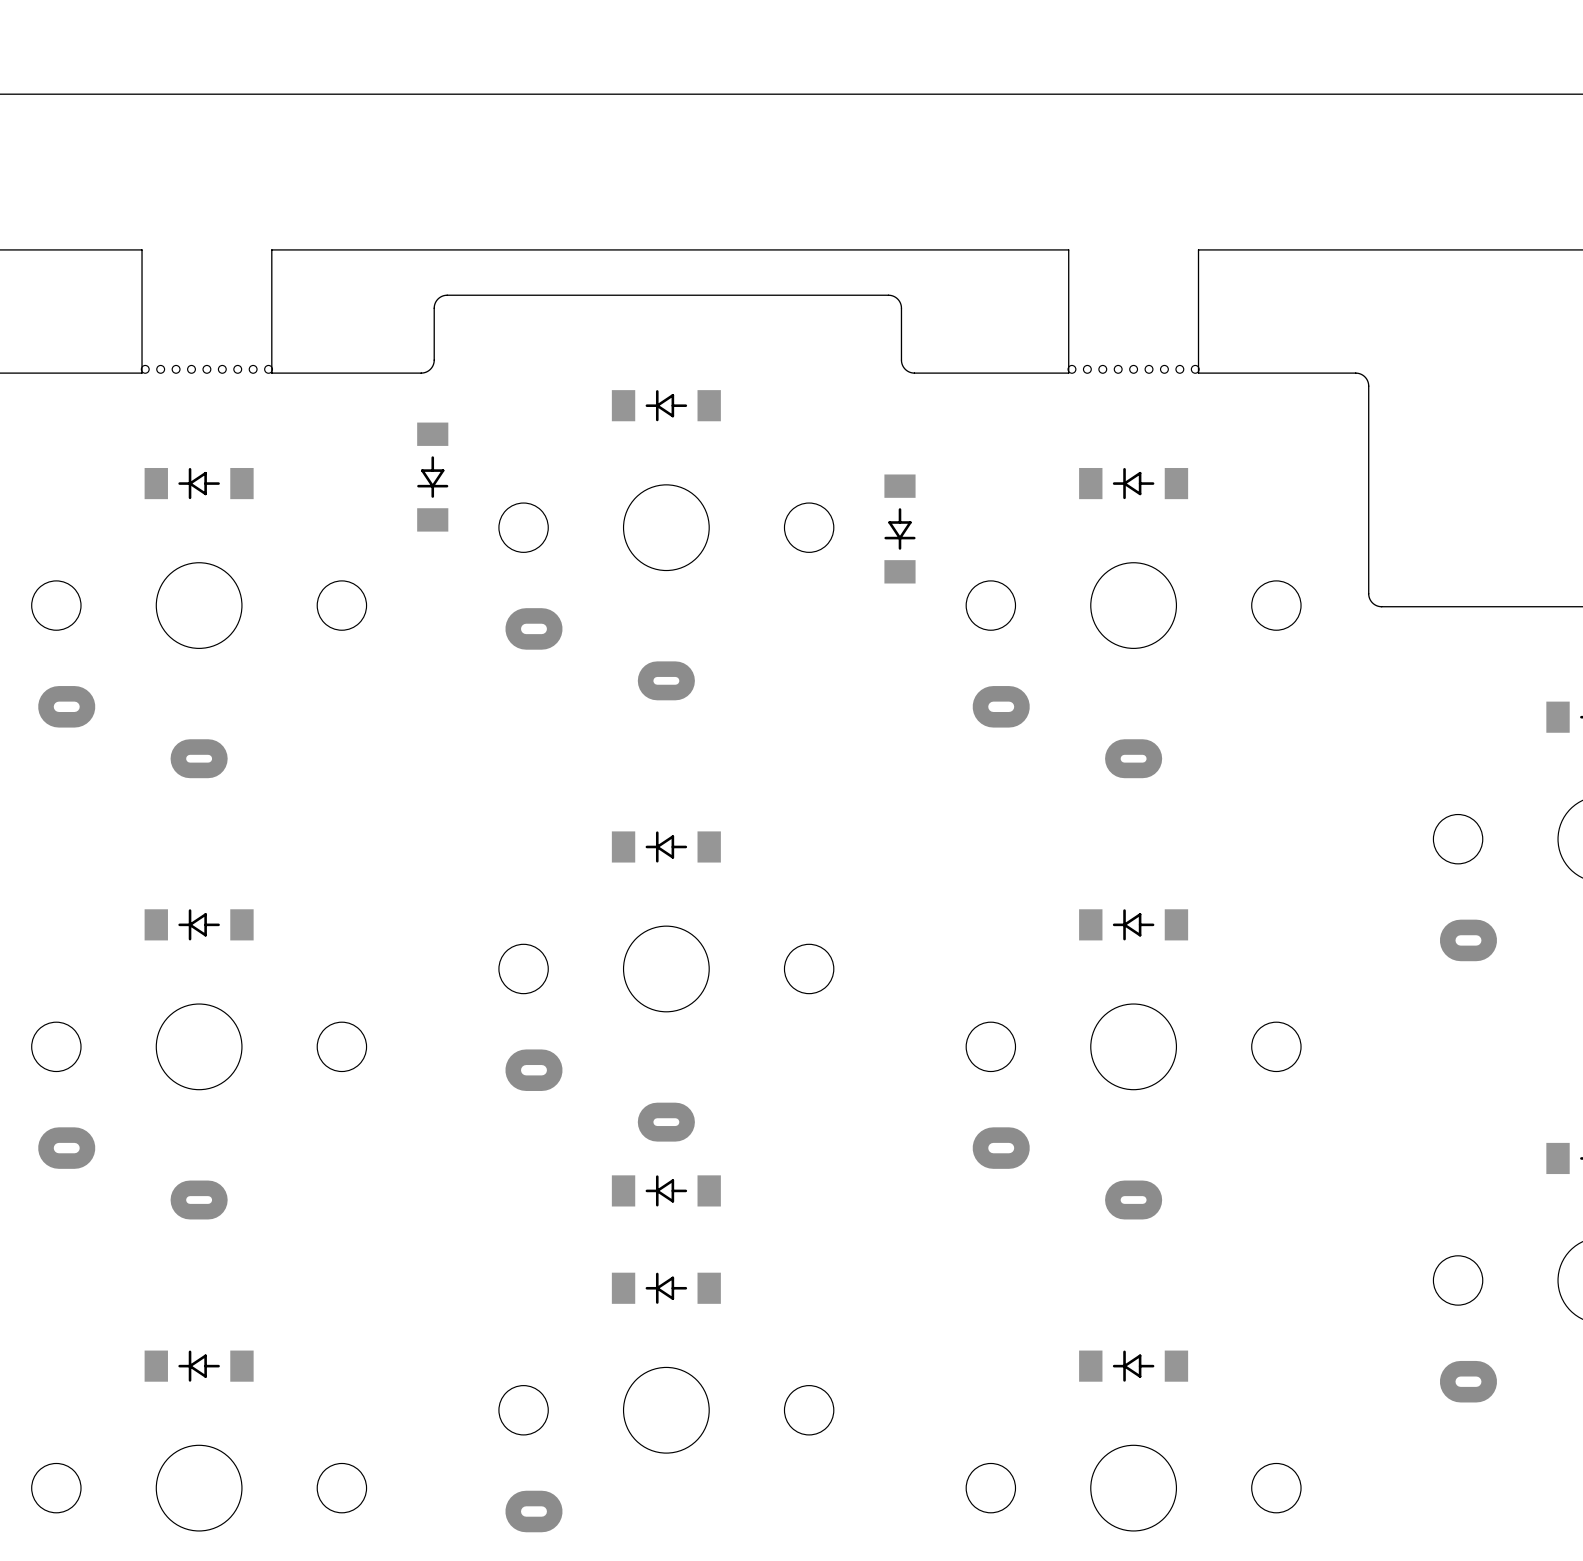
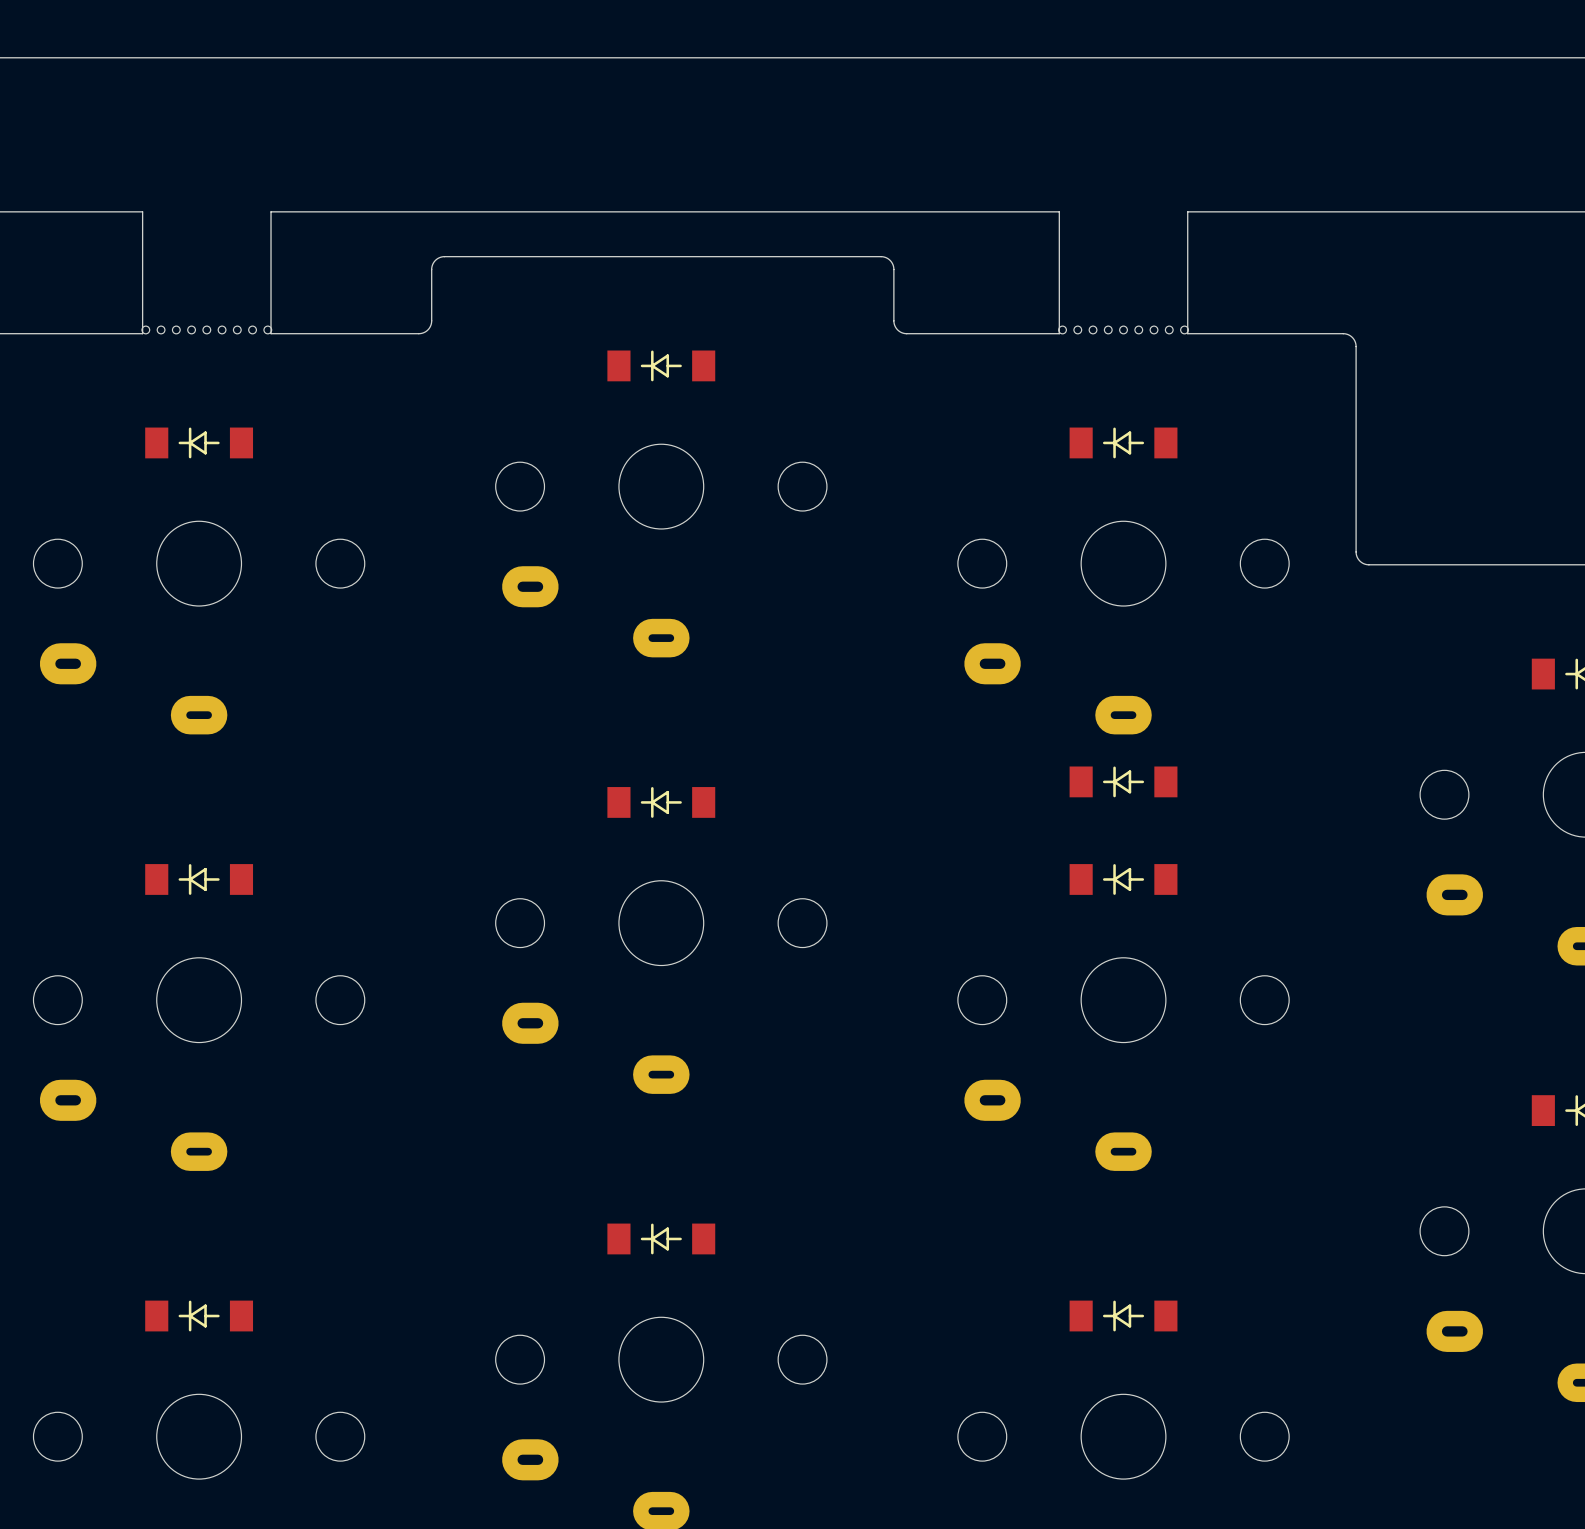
part: (432, 477) -> none
part: (899, 528) -> none
part: none -> (1123, 781)
part: (666, 1190) -> none

